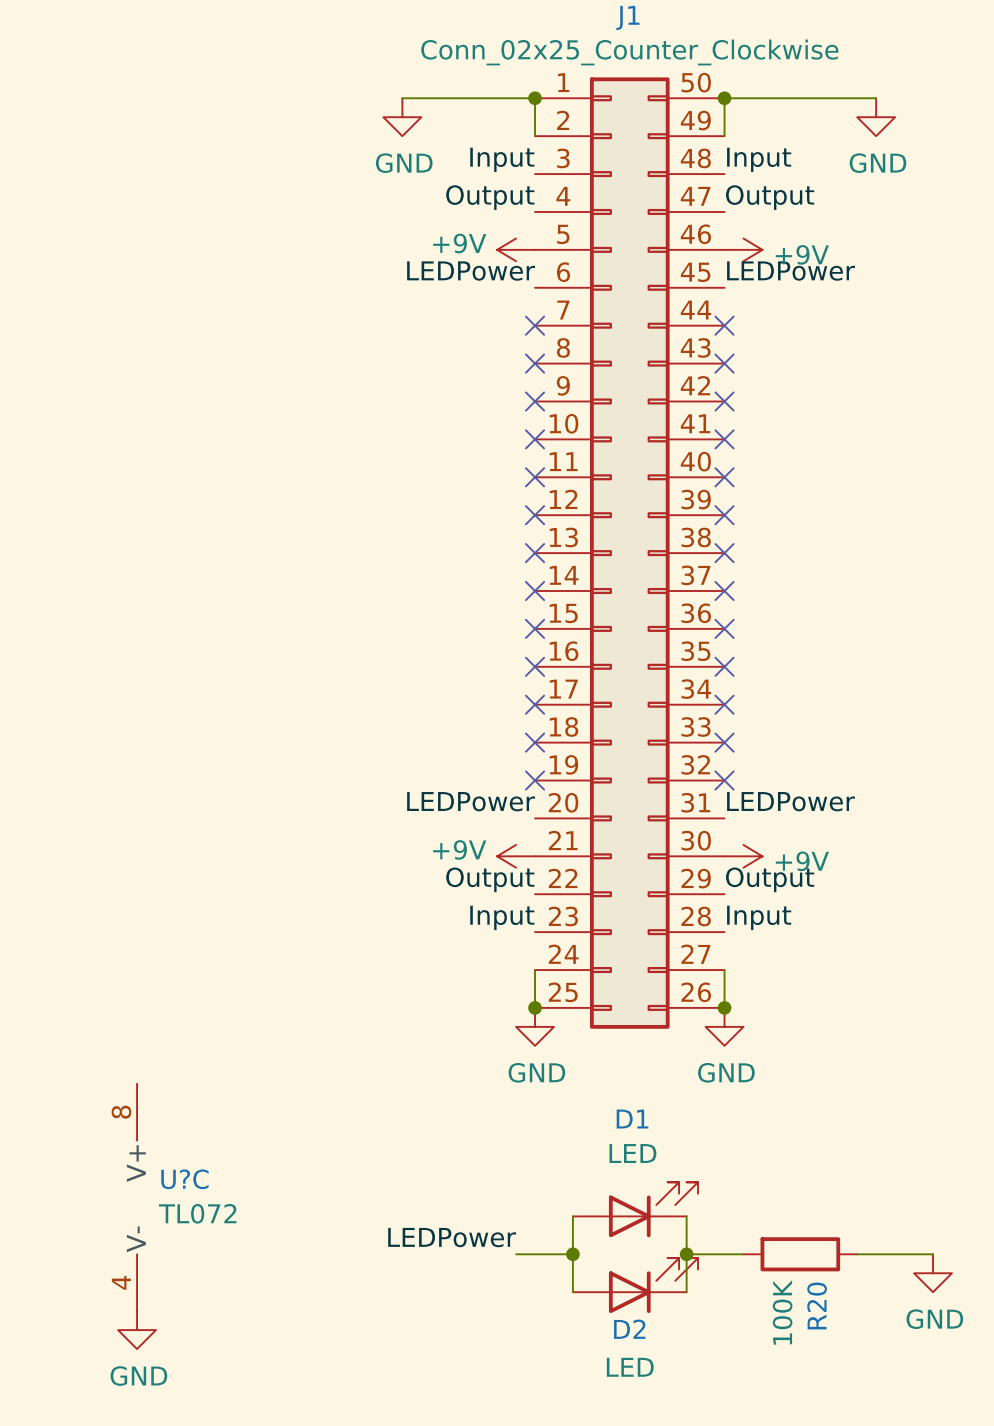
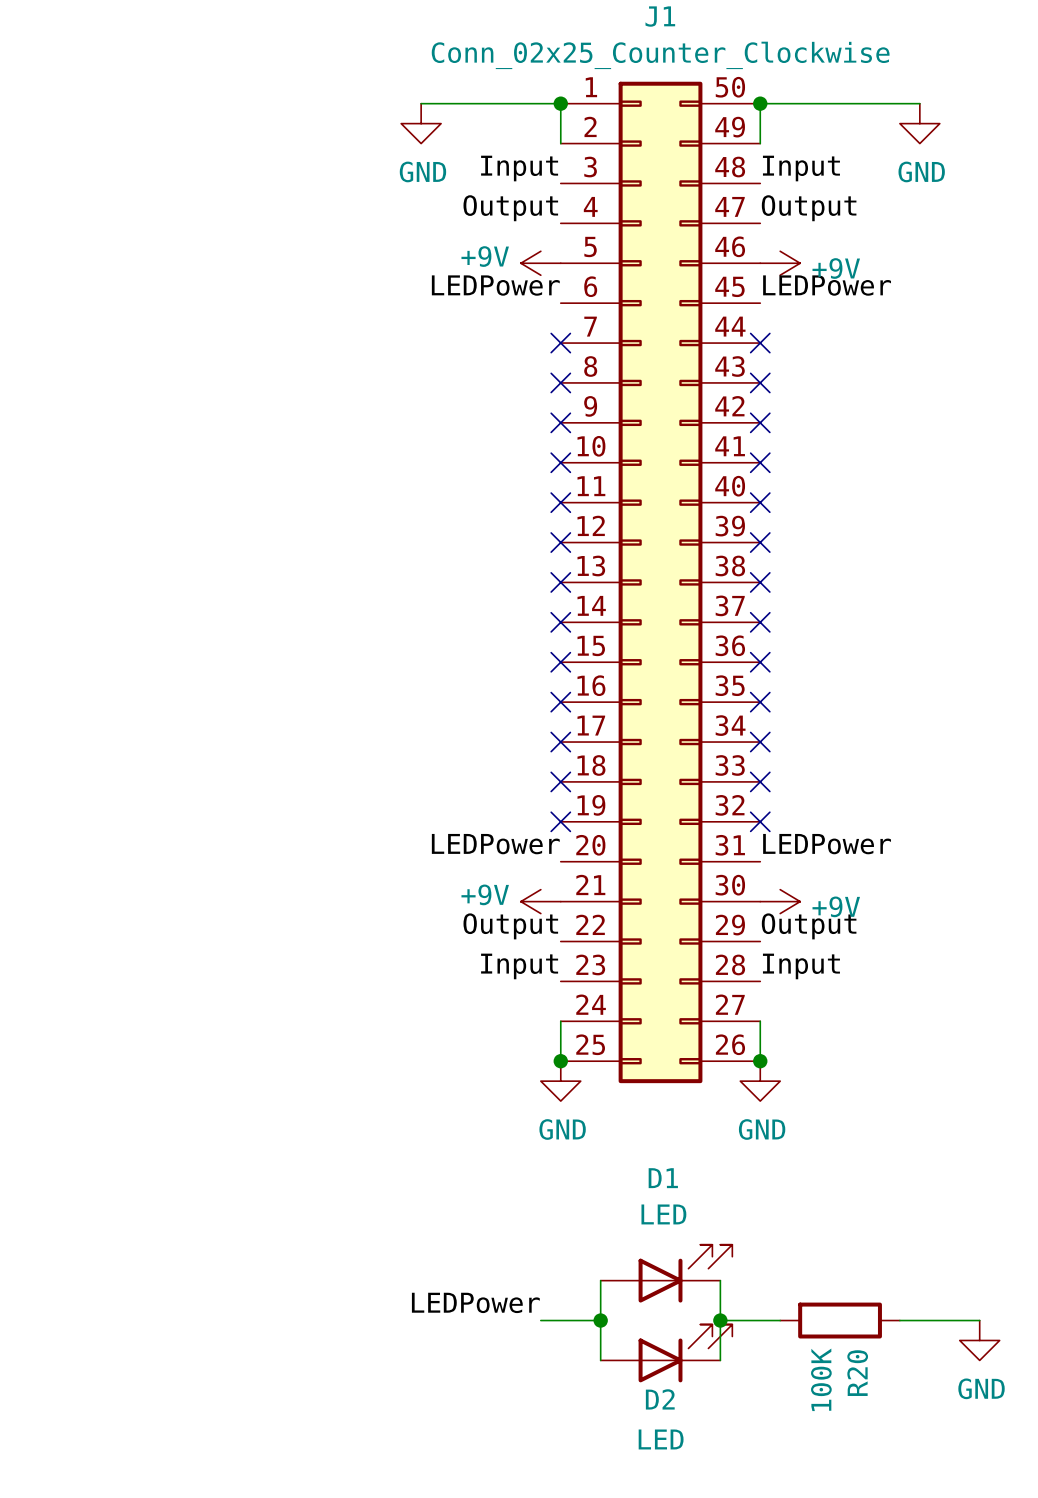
U?C: TL072 (137, 1197) -> none
power symbol: GND (137, 1330) -> none

